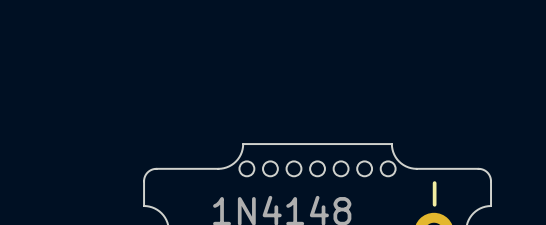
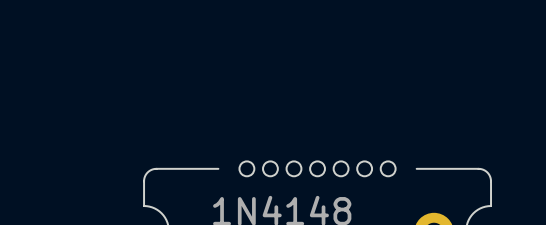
board edge: (218, 168) (229, 166) (235, 161) (241, 152) (243, 144) (391, 144) (393, 152) (399, 161) (408, 167) (416, 168) -> none
line: (434, 183) (434, 204) -> none

